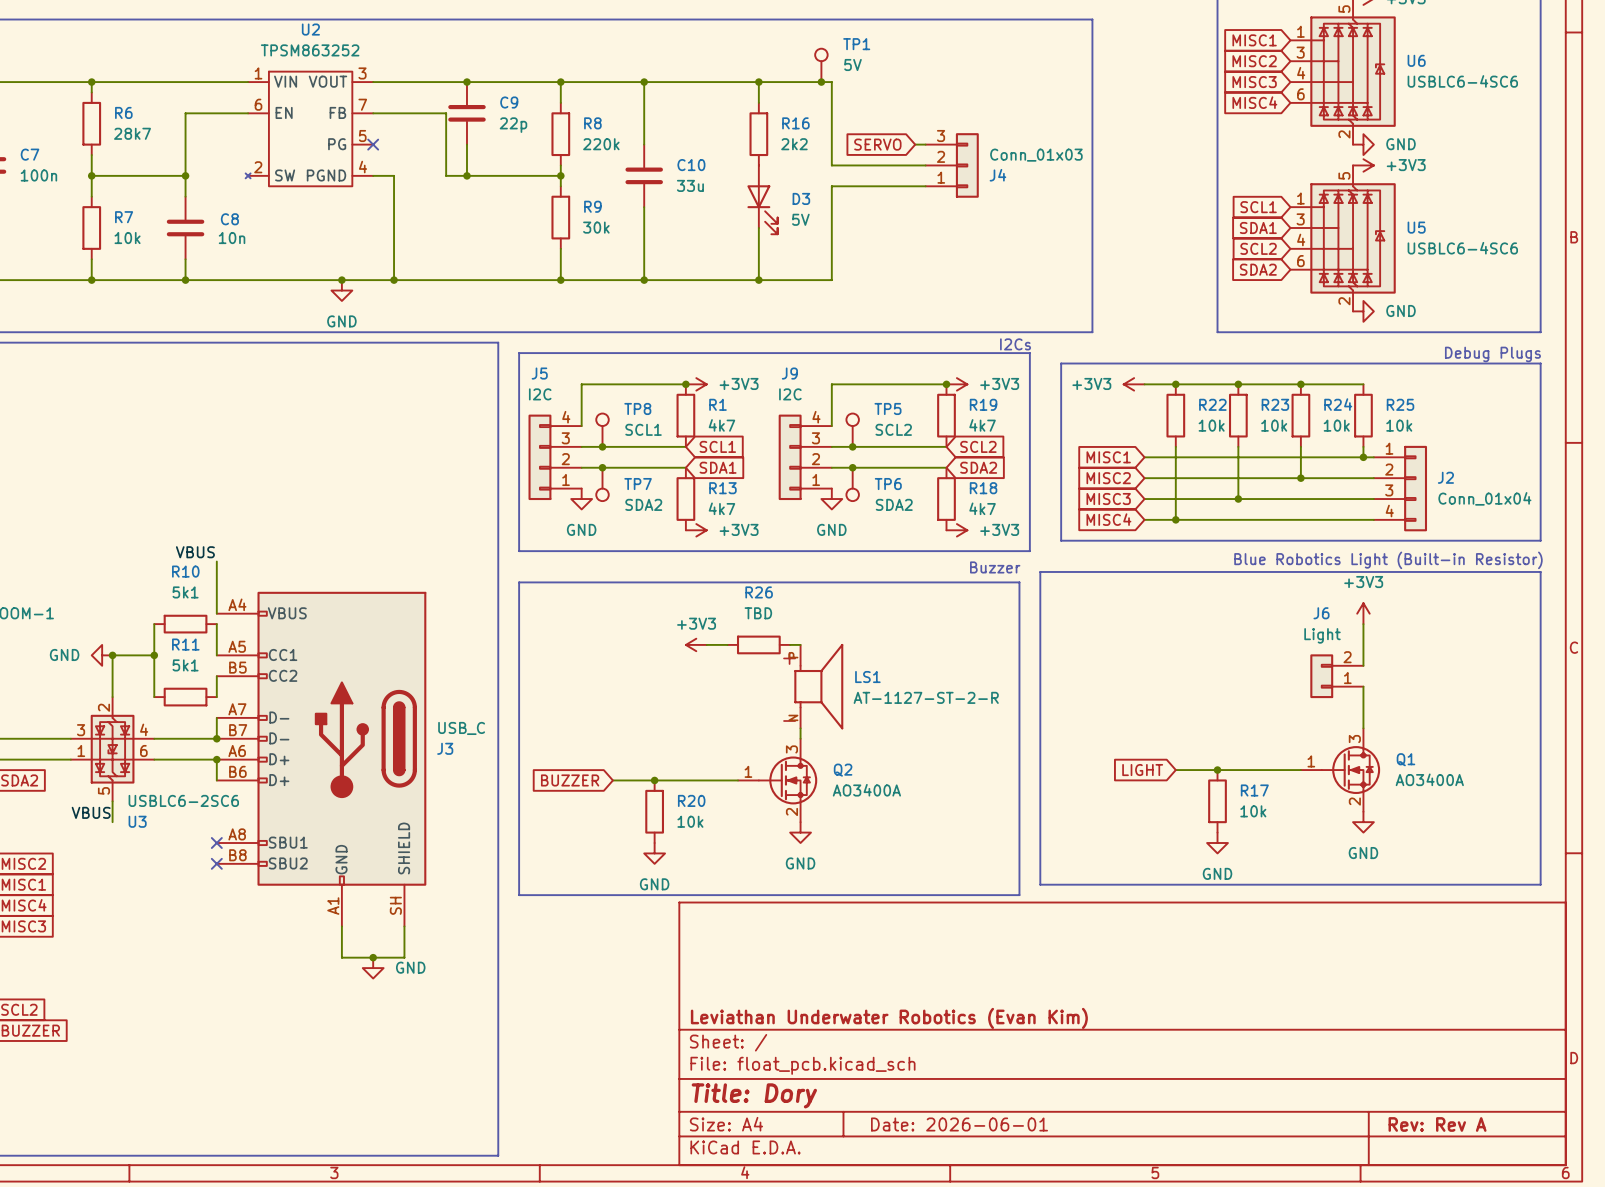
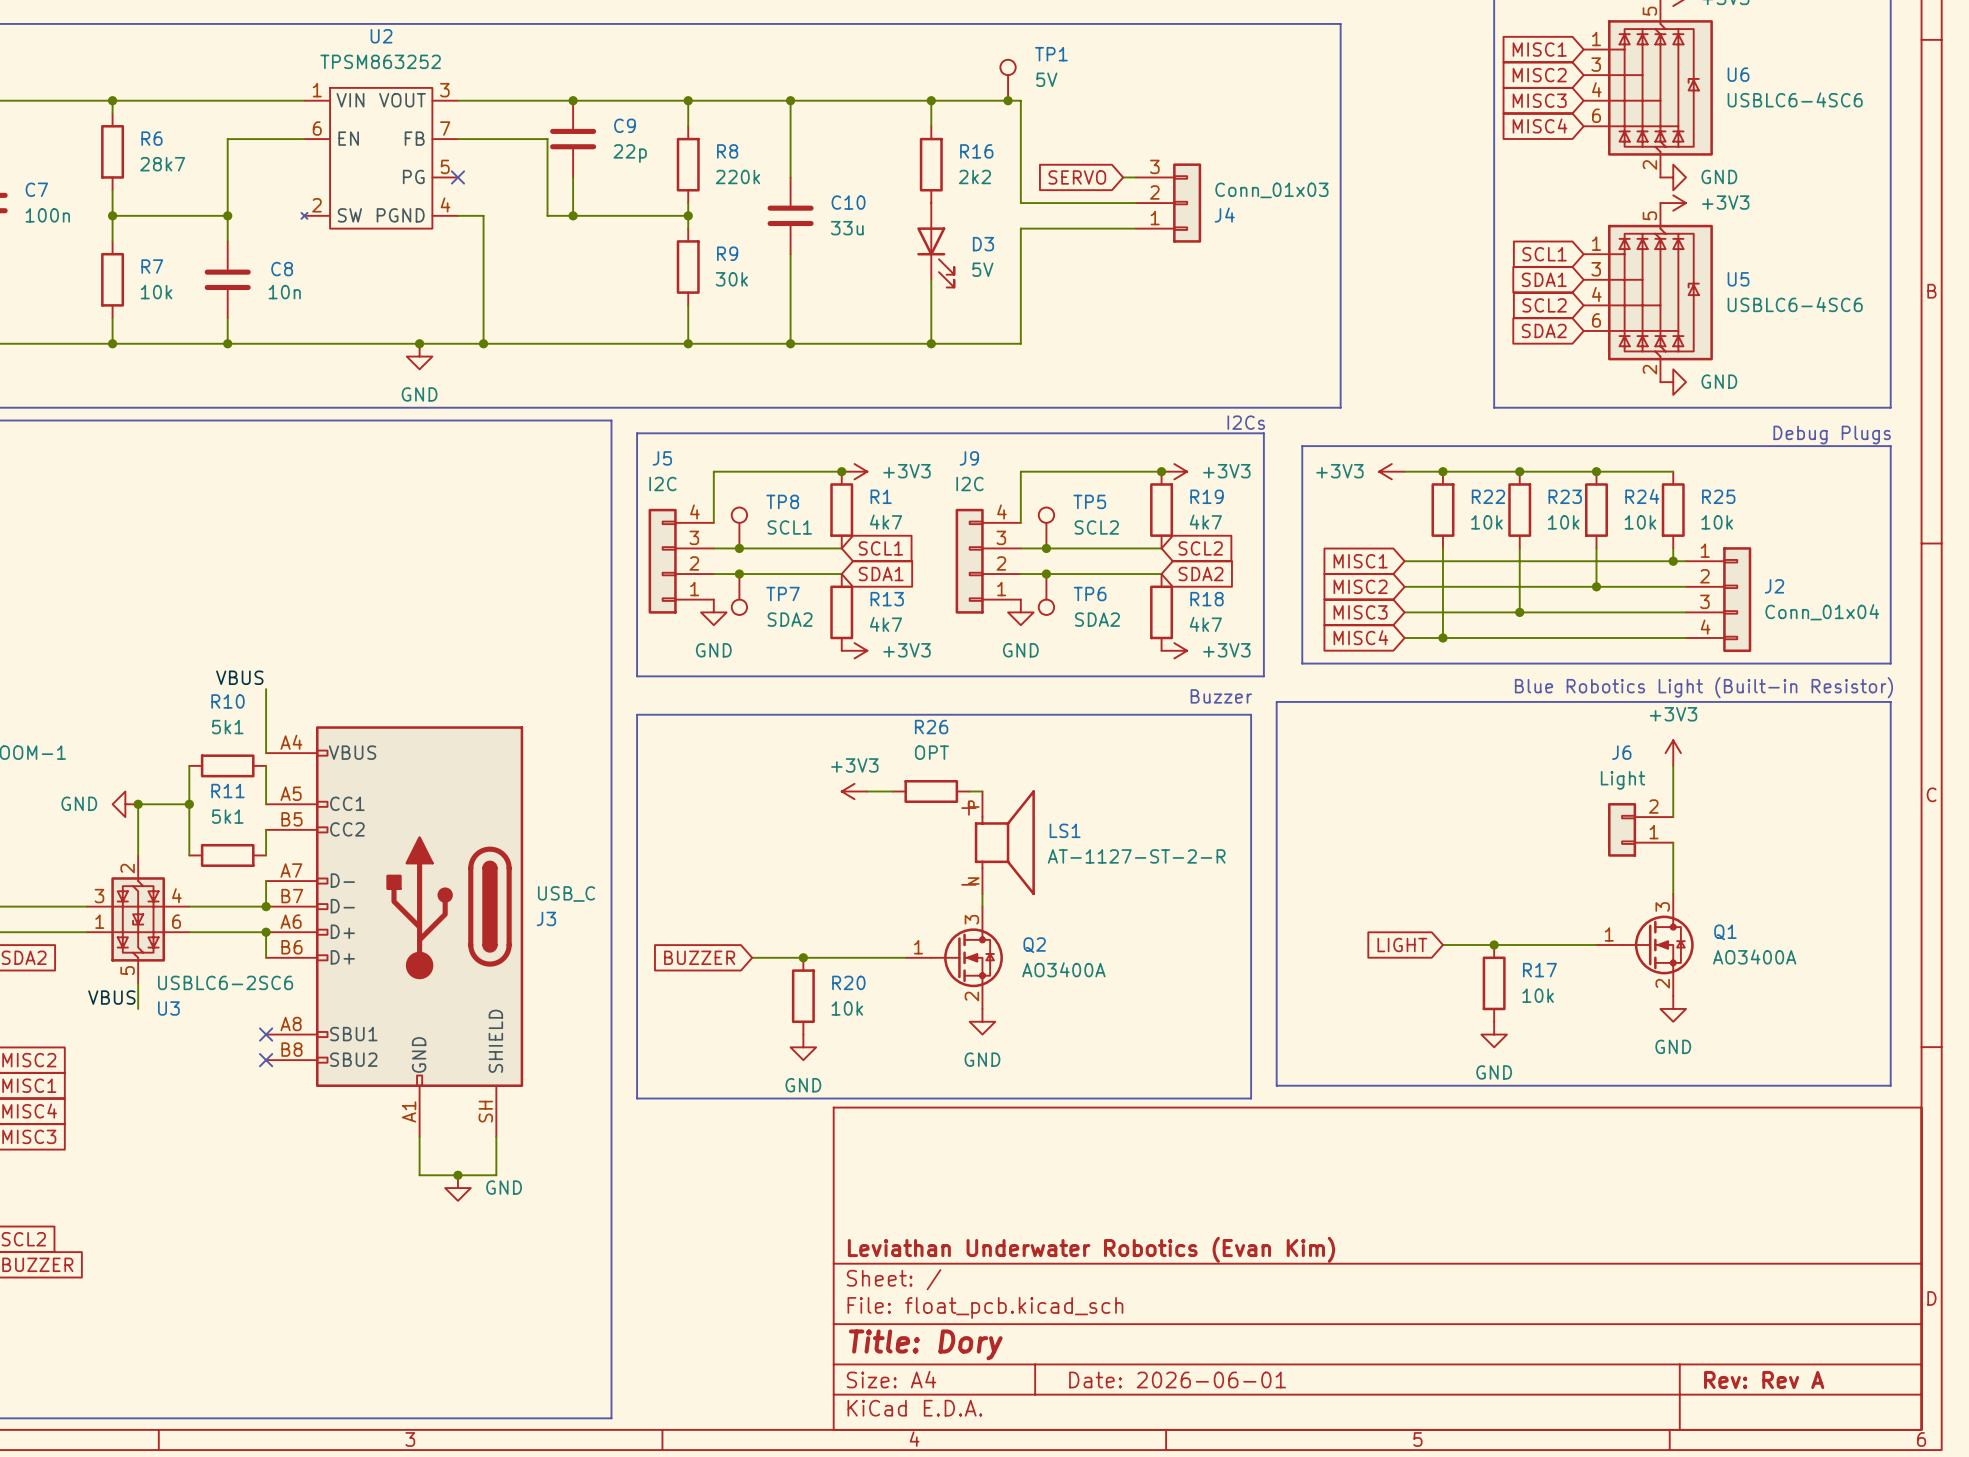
R26 value: TBD (758, 613) -> OPT (931, 752)

